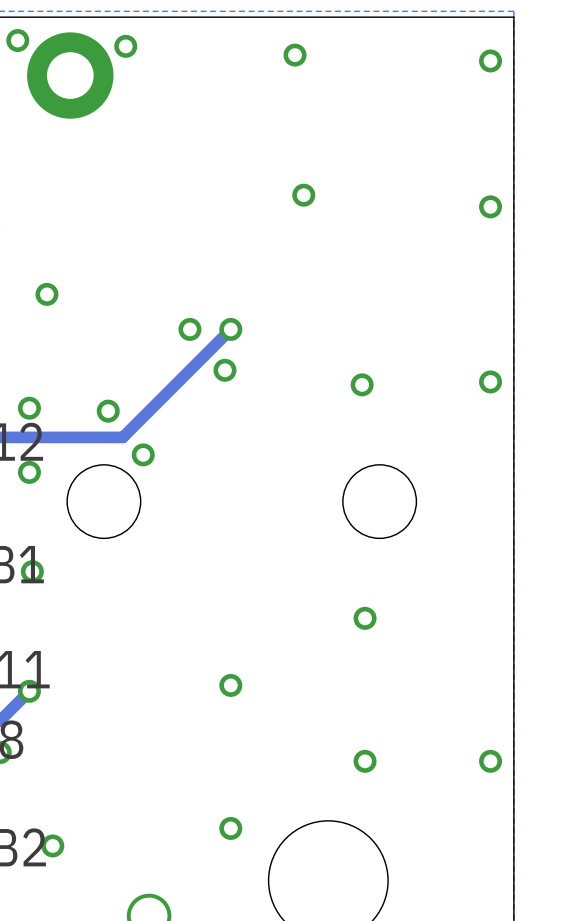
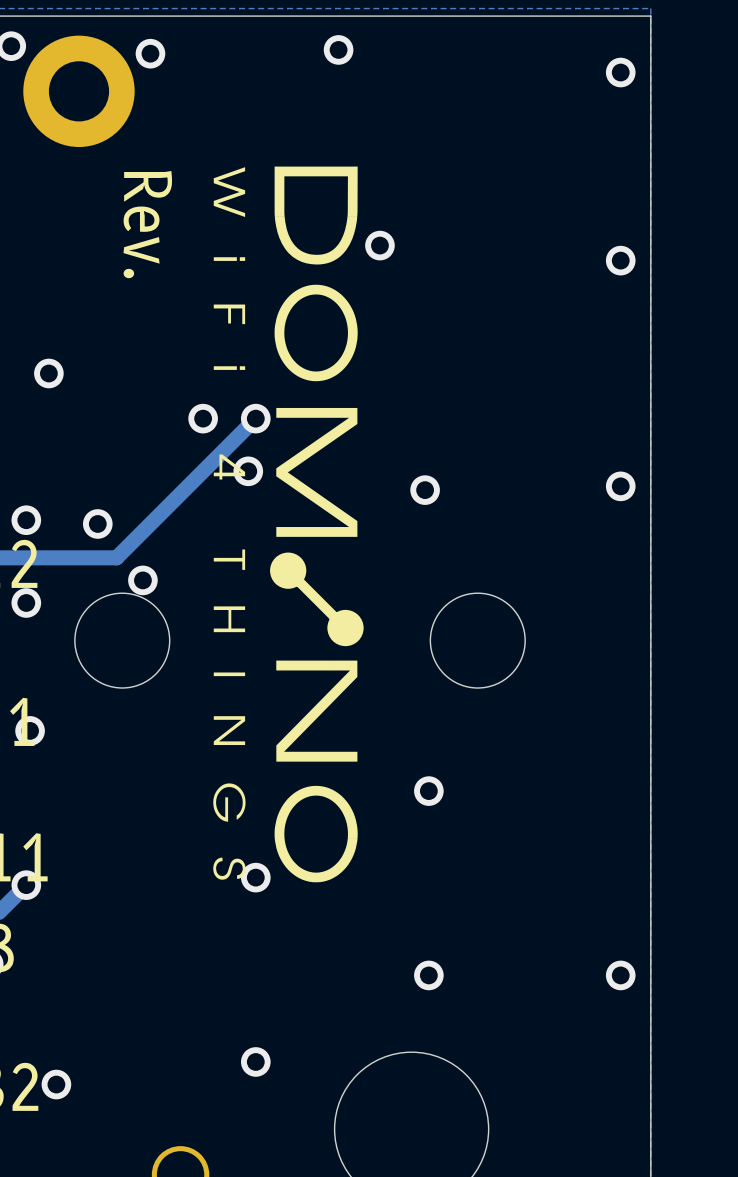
via position: (295, 55) -> (338, 49)
drawing: none -> [213, 166, 364, 883]
text: none -> Rev. (147, 224)
via: none -> (203, 418)
via position: (189, 329) -> (255, 418)
track: (230, 329) (122, 437) (99, 437) -> (255, 418) (116, 557)
via: (230, 329) -> none
via: none -> (248, 471)
via: (224, 370) -> none
via position: (362, 384) -> (425, 490)
via: none -> (97, 523)
via: (108, 411) -> none
via: none -> (142, 580)
via: (143, 454) -> none
via position: (365, 618) -> (428, 791)
via position: (230, 685) -> (255, 877)
via position: (365, 761) -> (428, 975)
via position: (230, 828) -> (255, 1061)

